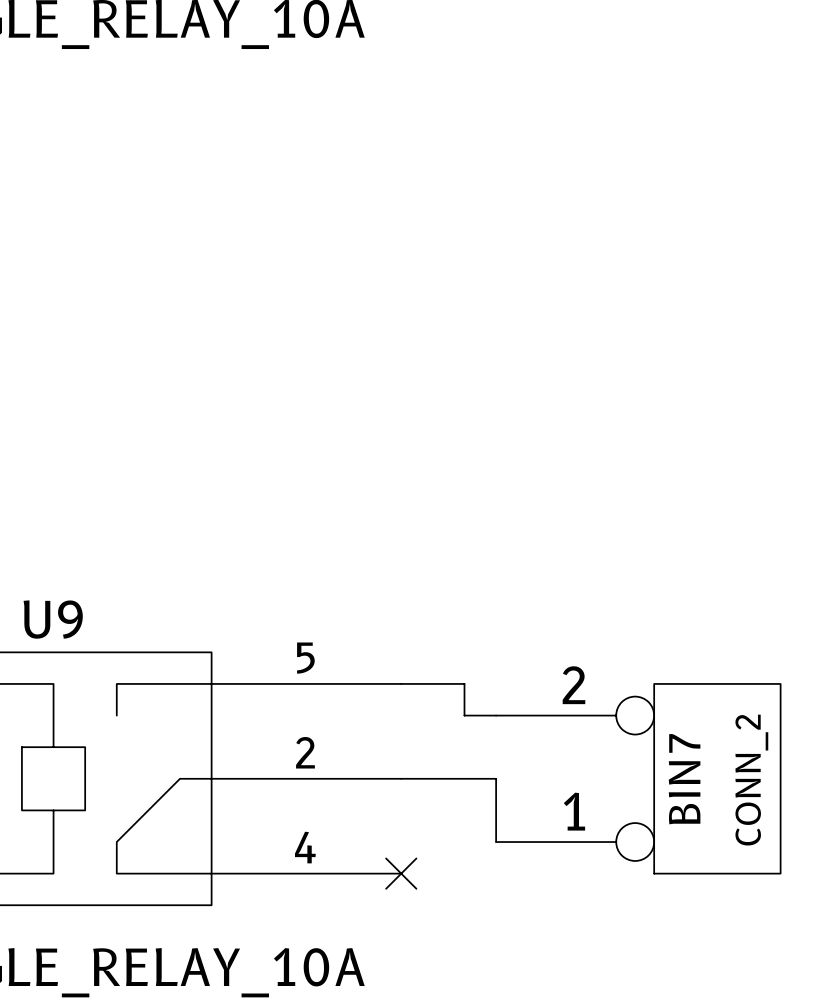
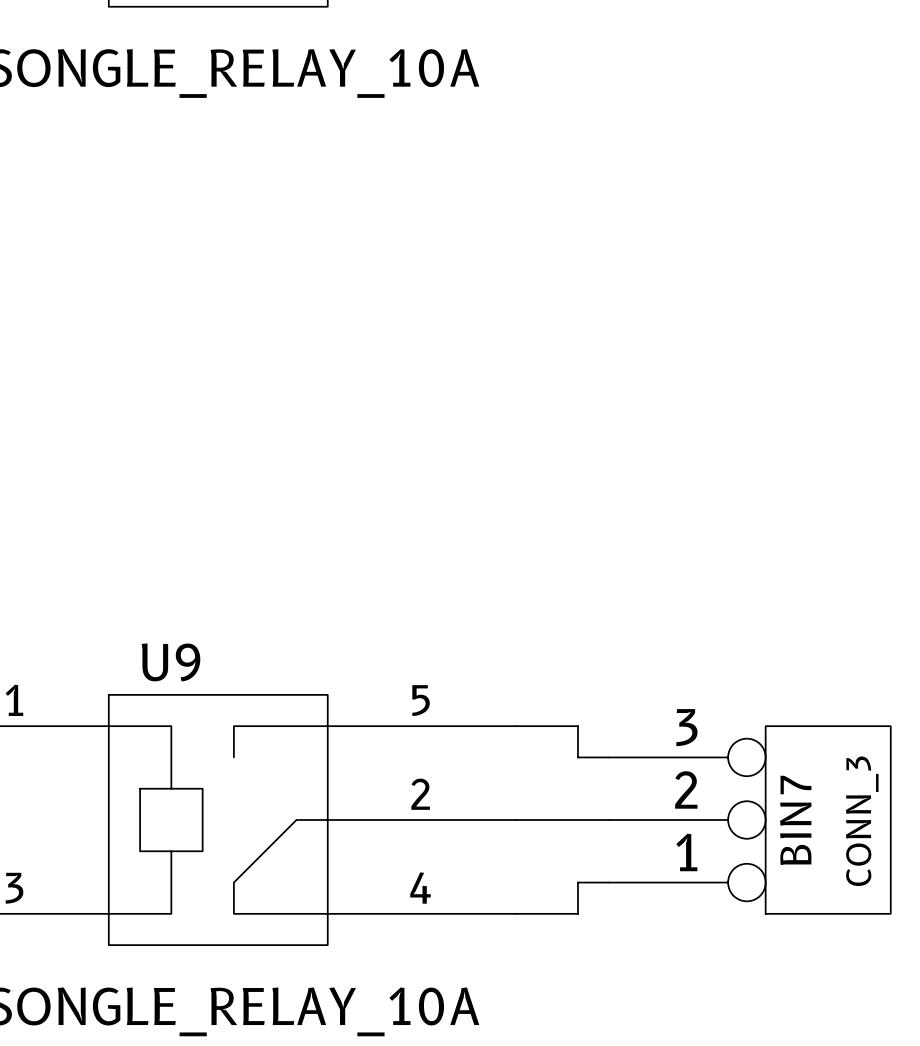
BIN7 symbol: [496, 683, 781, 874] -> [609, 726, 891, 914]
wire: (496, 778) (496, 842) -> (515, 913) (577, 913) (577, 882) (609, 882)
BIN7 value: CONN_2 (751, 780) -> CONN_3 (862, 821)
no-connect mark: (401, 873) -> none

